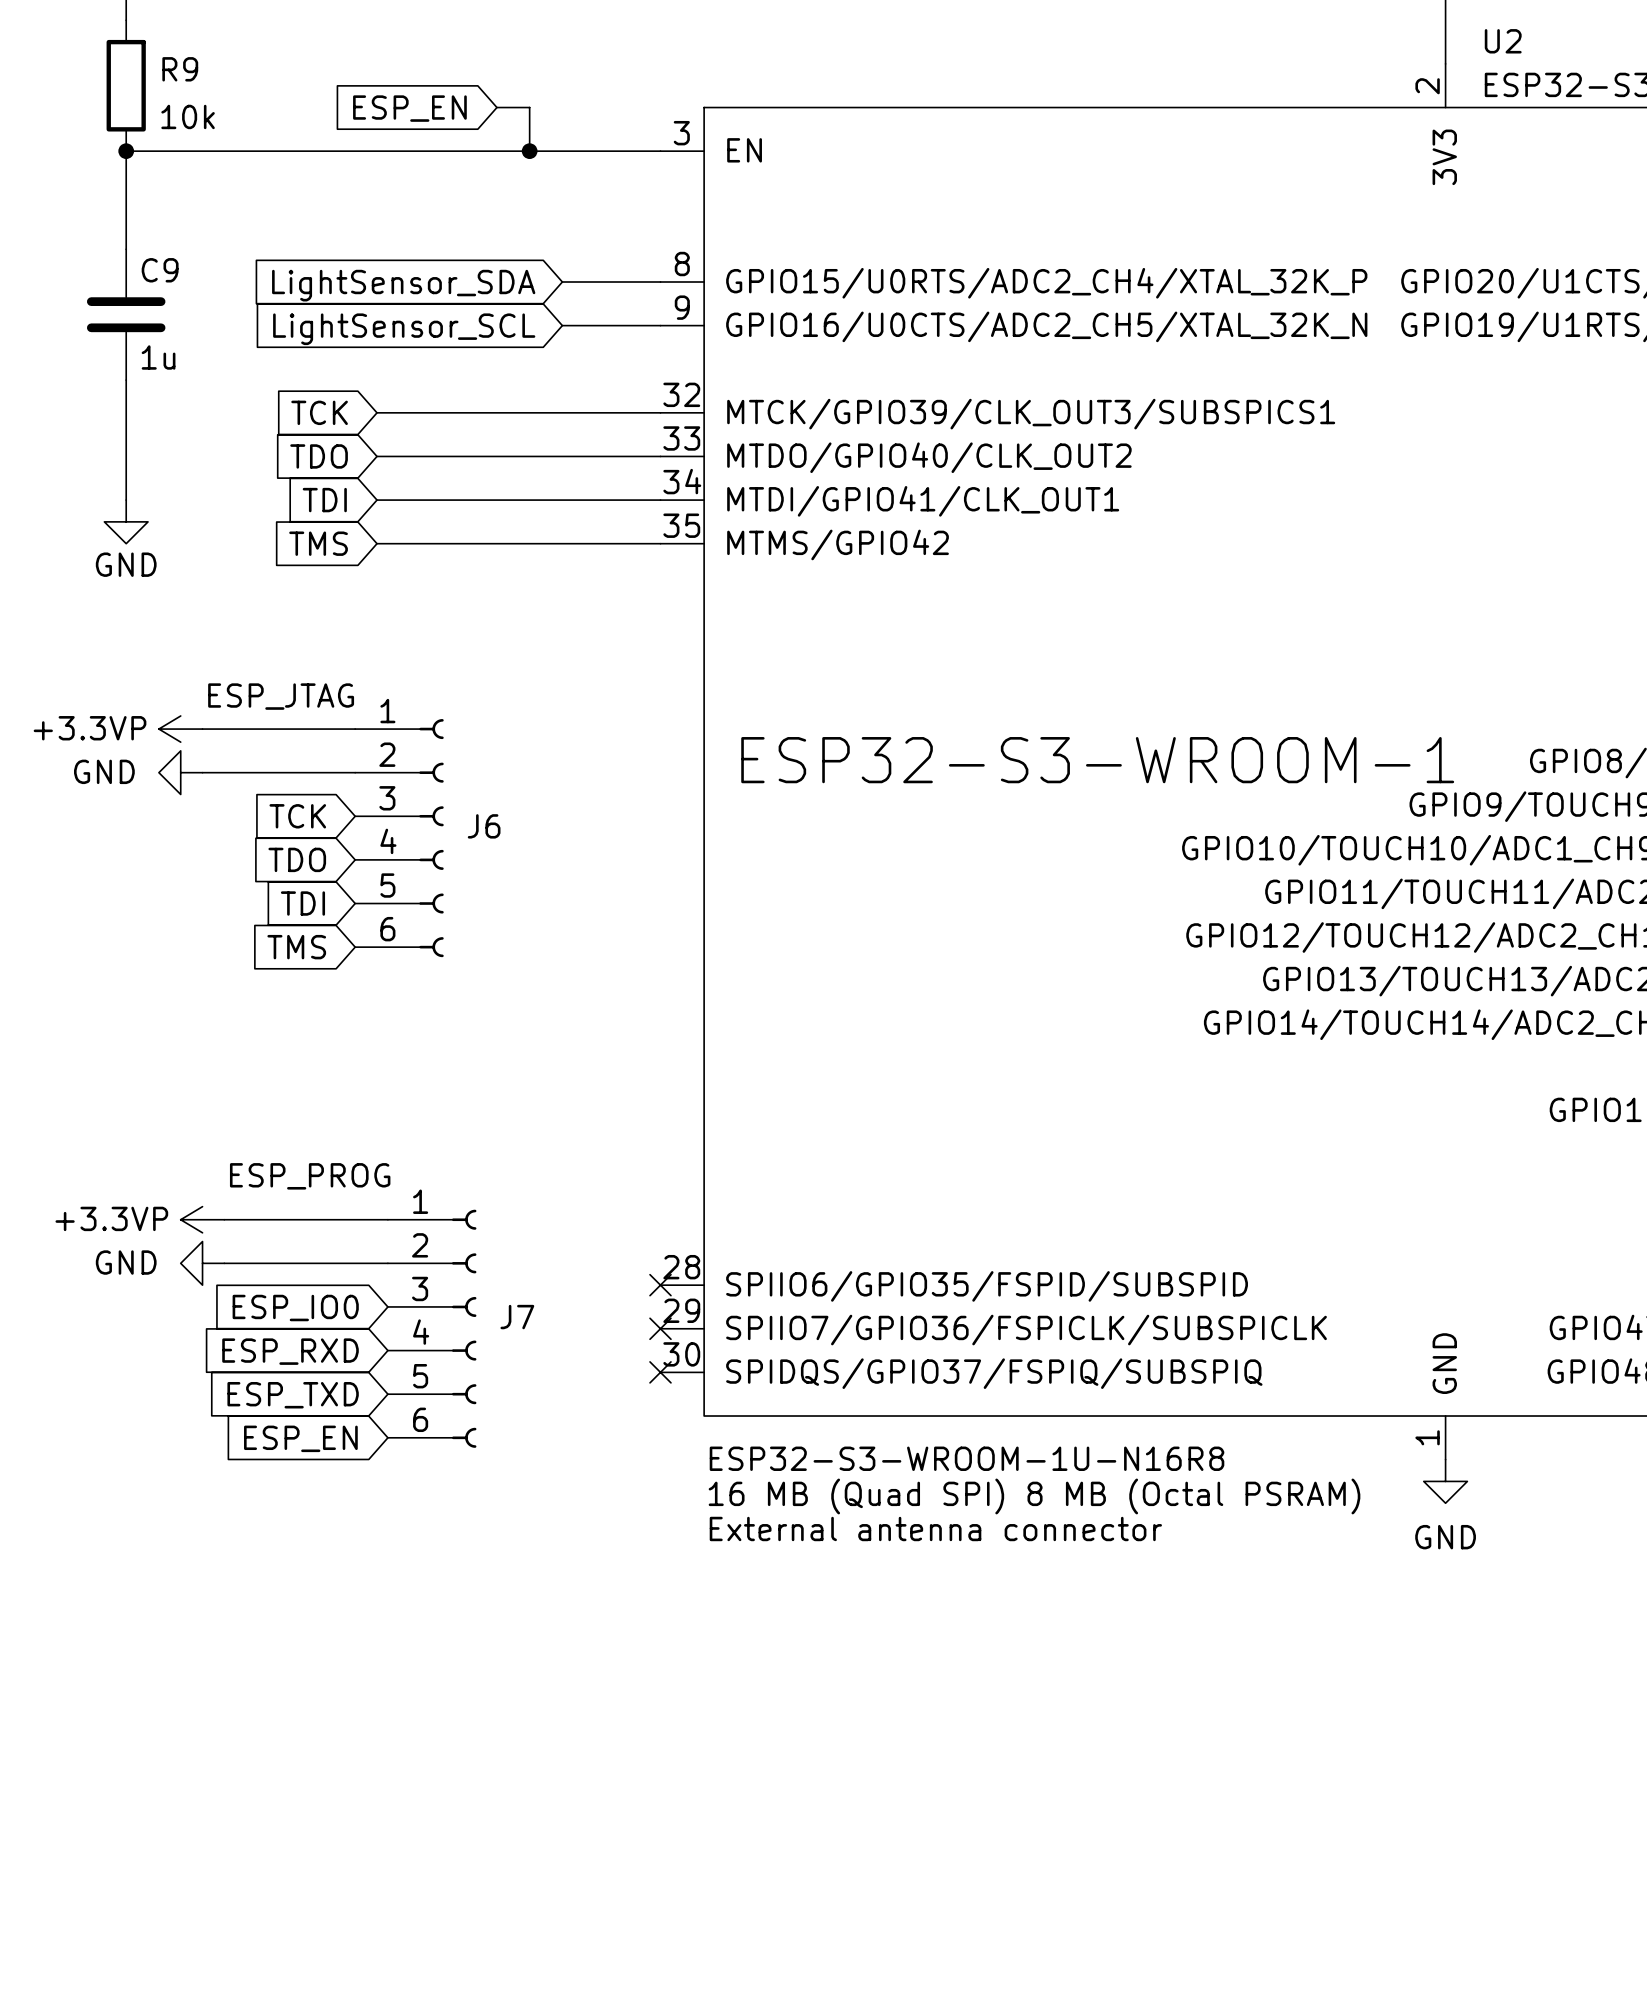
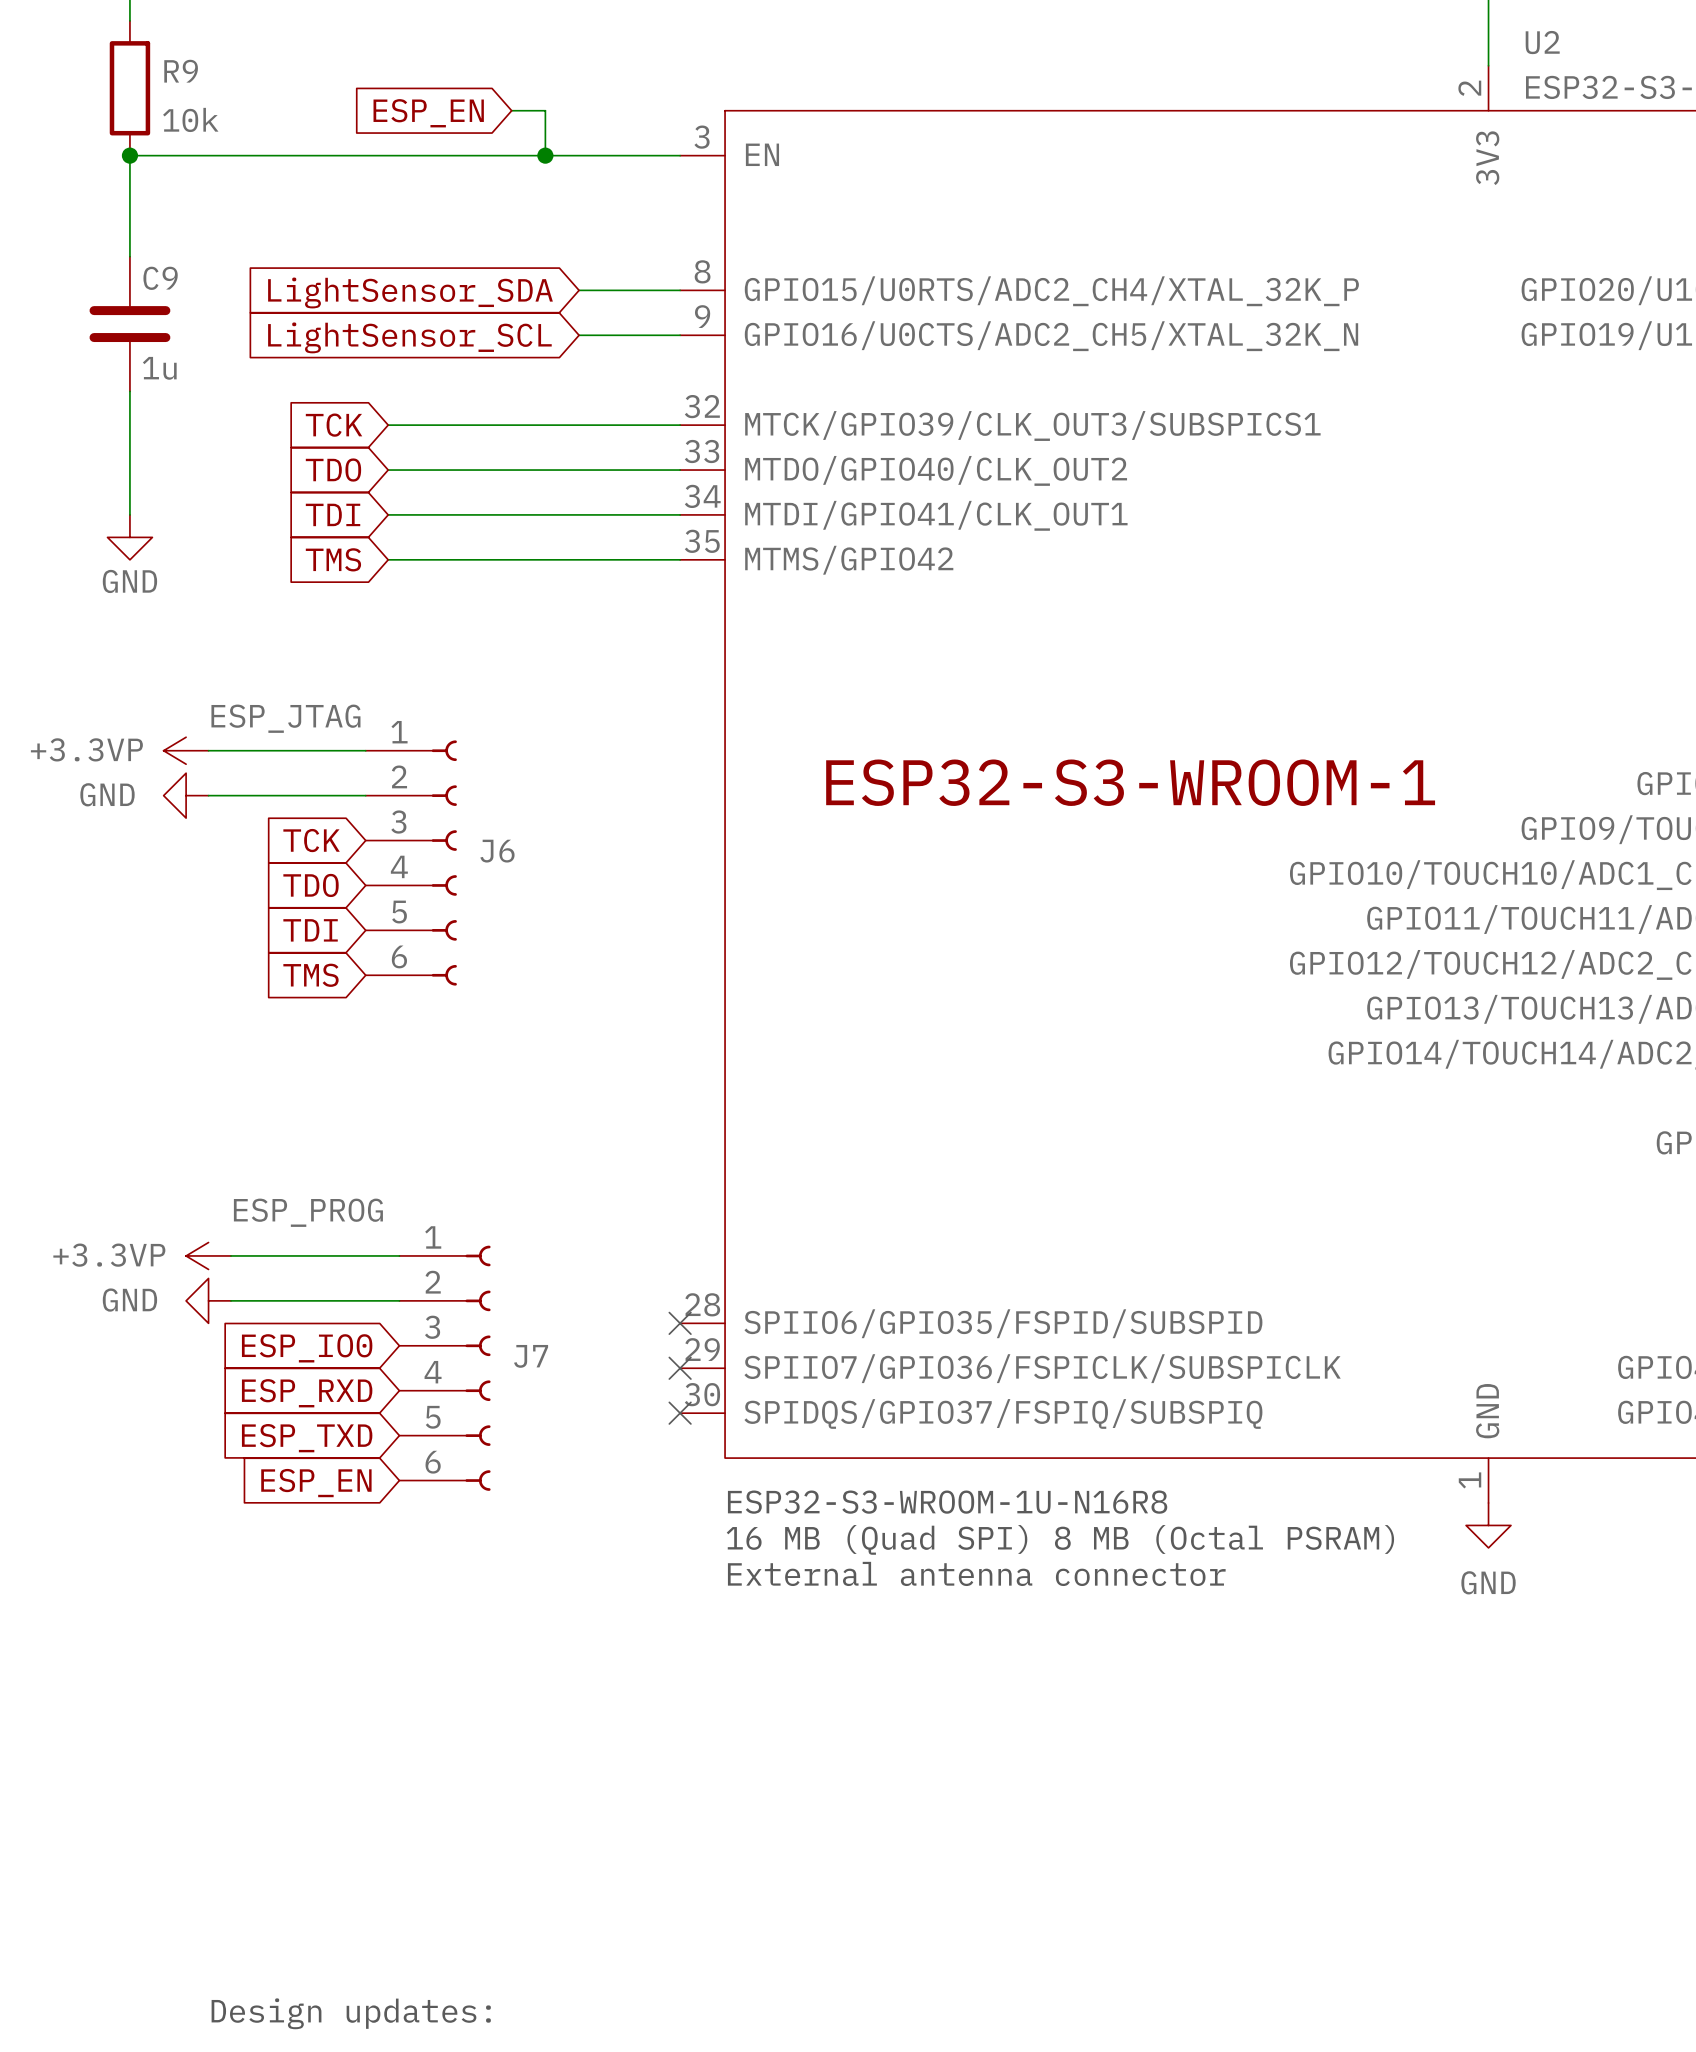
text: none -> Design updates: (351, 2013)

